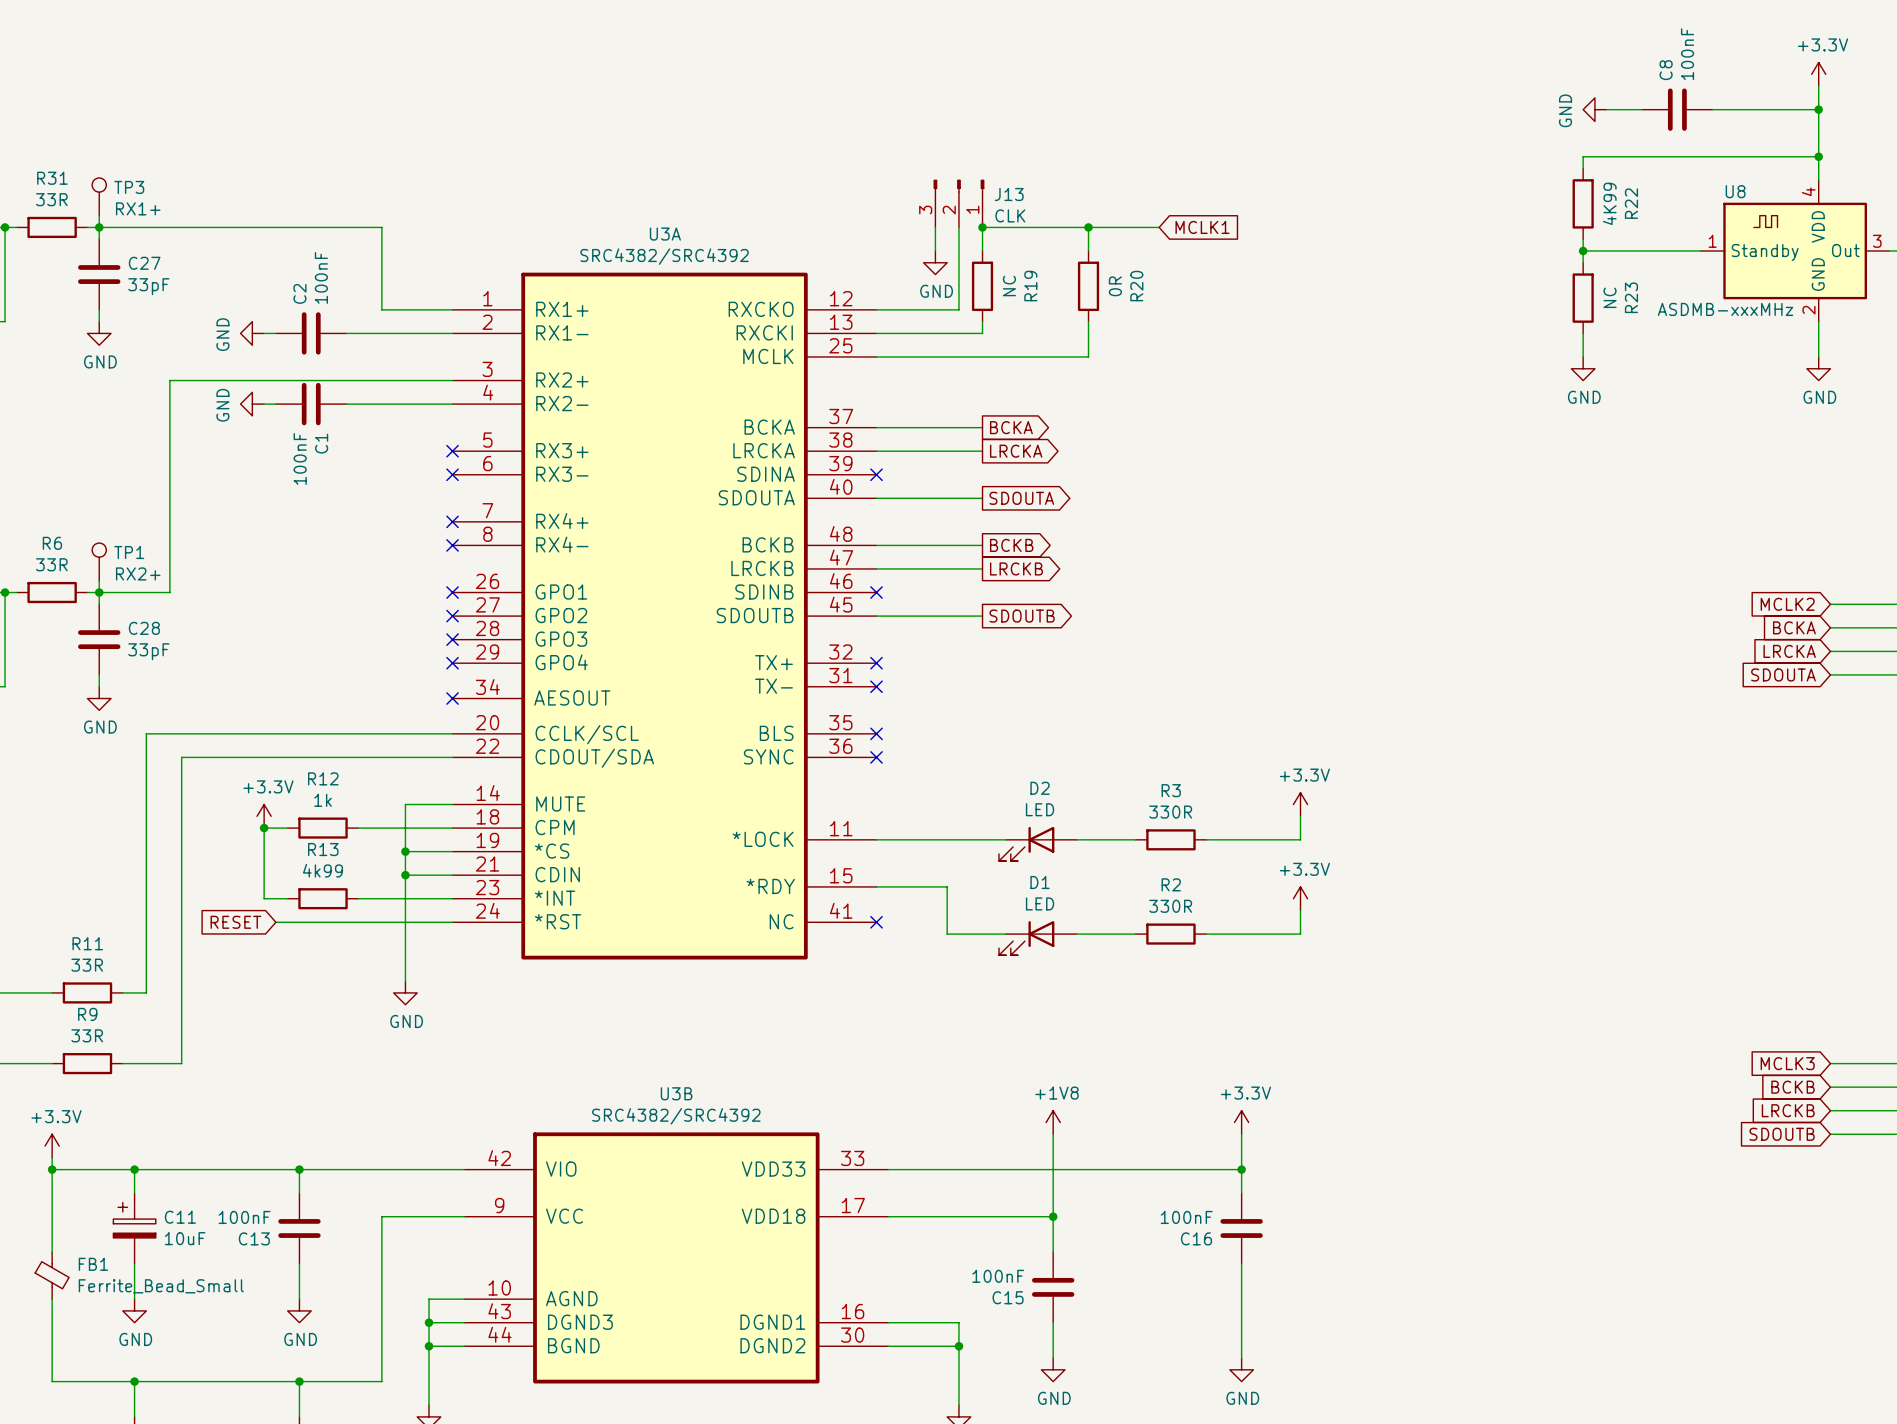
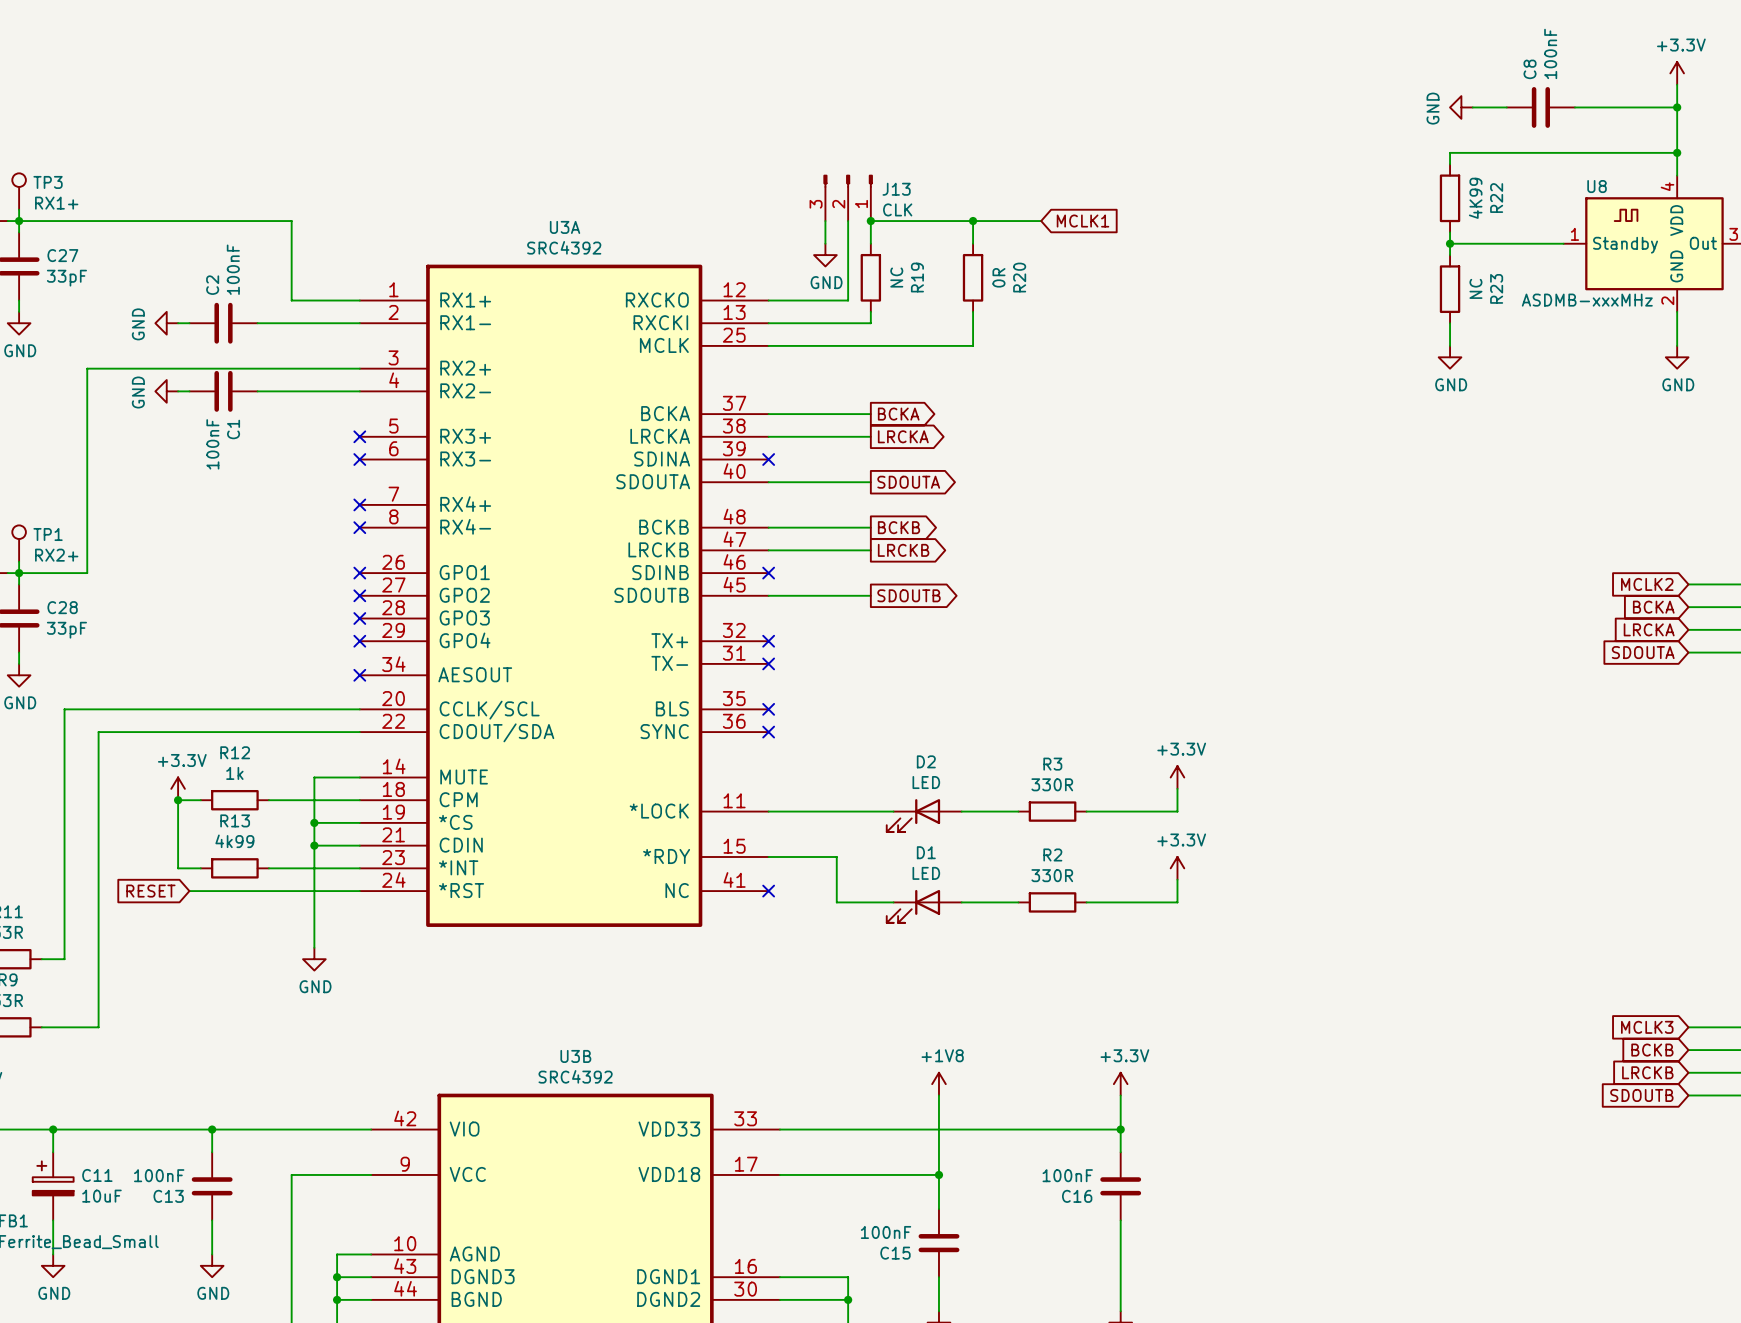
U3A value: SRC4382/SRC4392 (664, 256) -> SRC4392 (564, 247)
U3B value: SRC4382/SRC4392 (676, 1116) -> SRC4392 (575, 1076)

